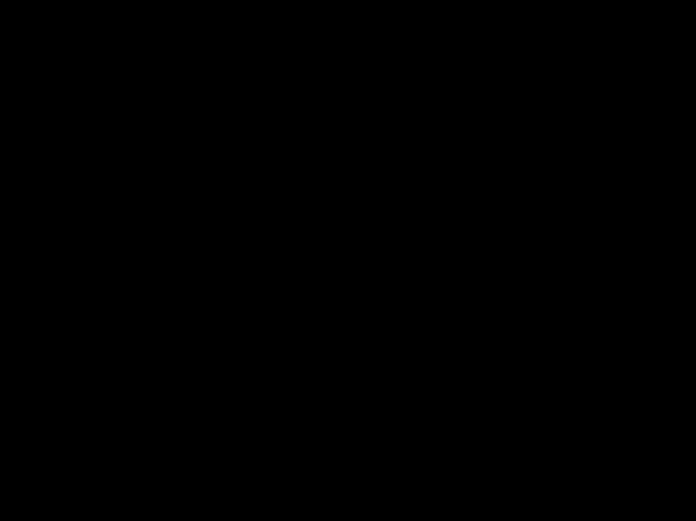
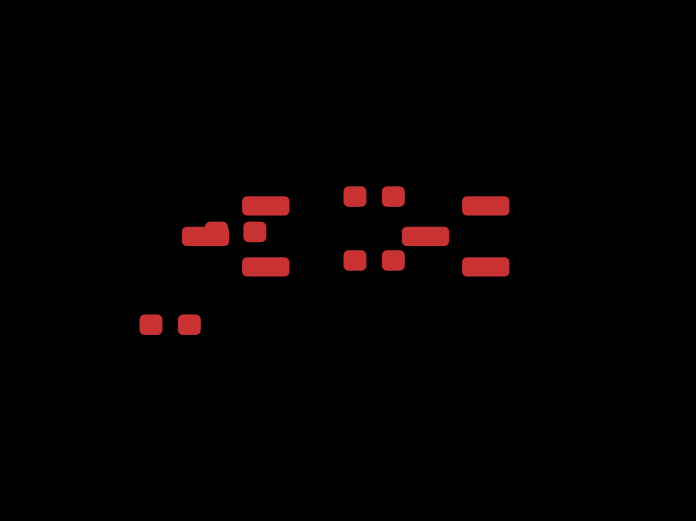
part: none -> (374, 196)
part: none -> (235, 231)
part: none -> (235, 236)
part: none -> (455, 236)
part: none -> (374, 260)
part: none -> (170, 324)

